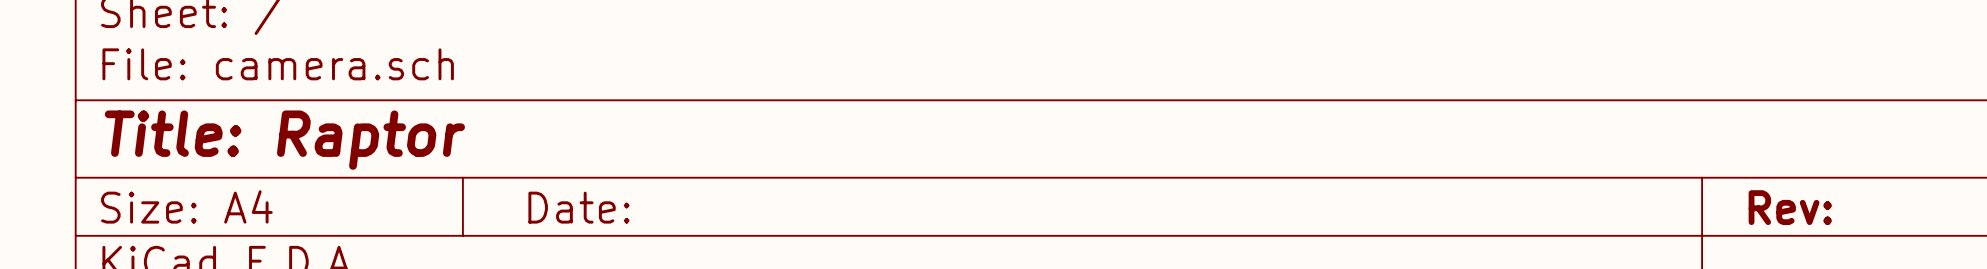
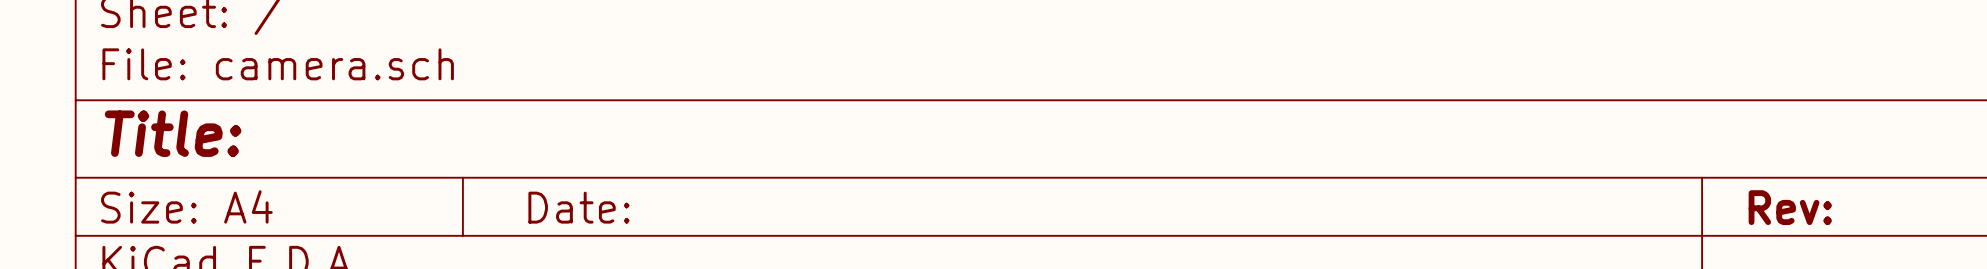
title block: Title: Raptor (284, 140) -> Title: (173, 133)

